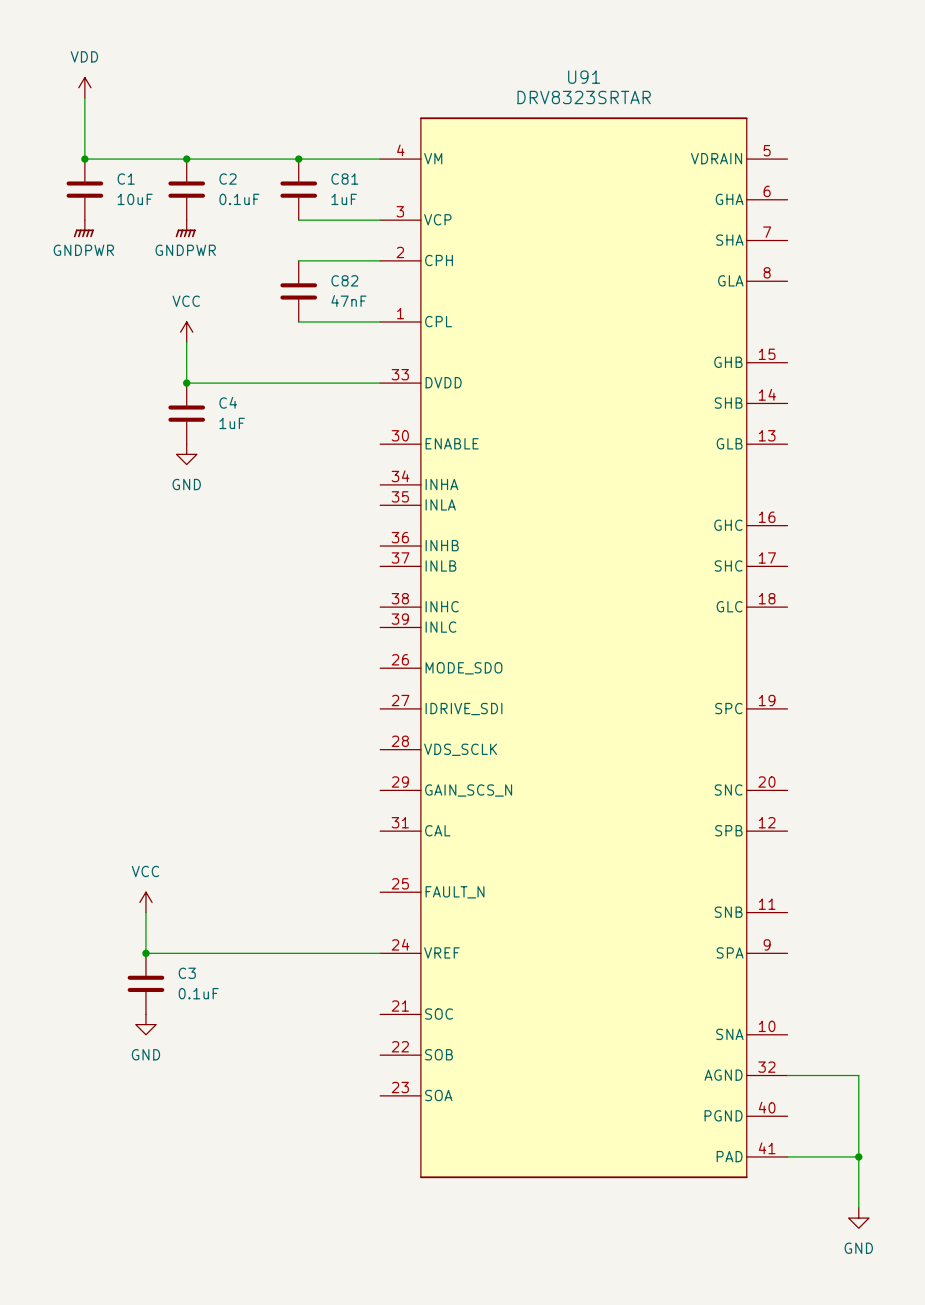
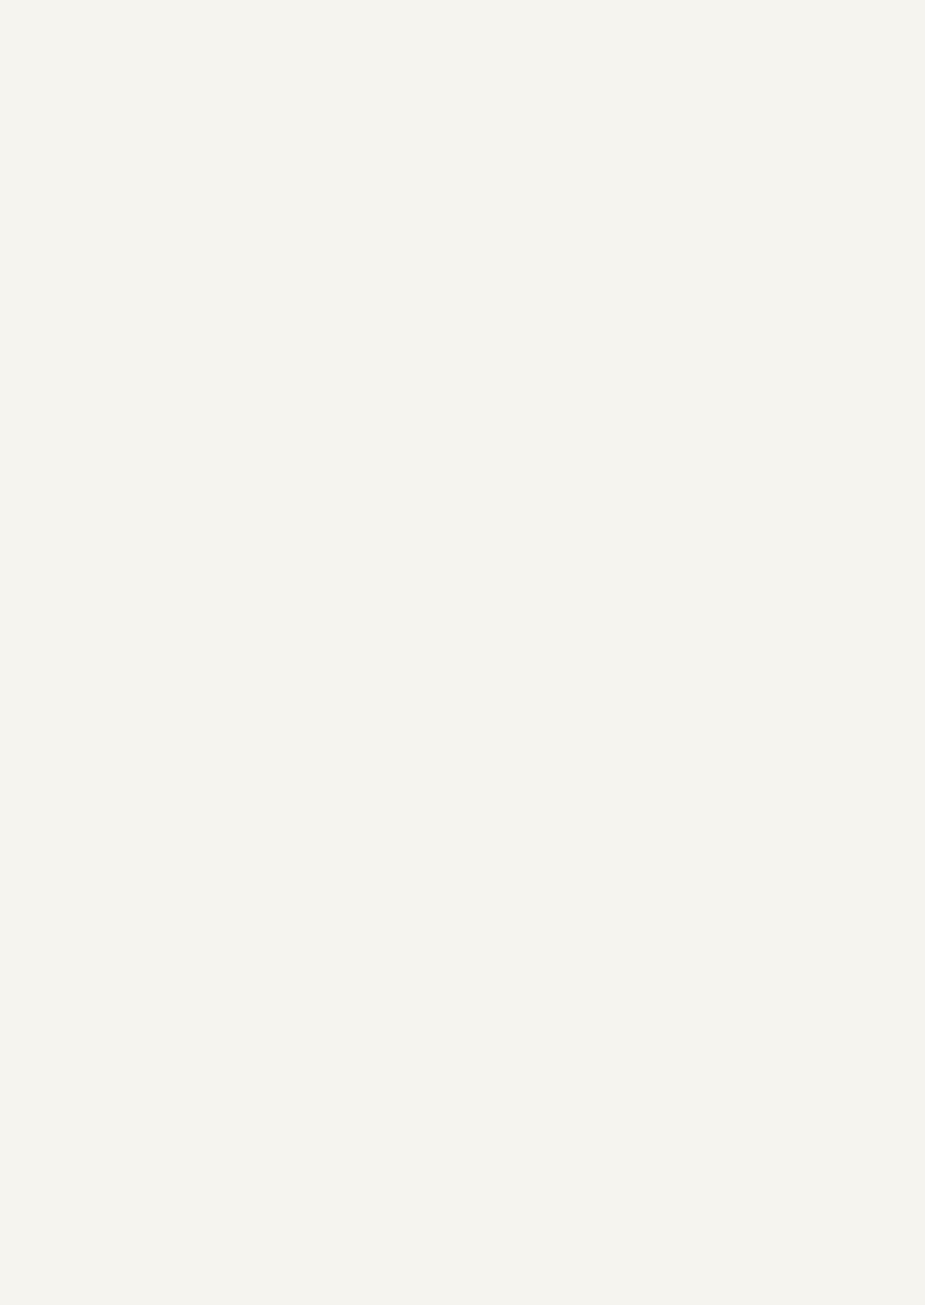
power symbol: VDD (84, 87) -> none
wire: (84, 97) (84, 159) (380, 159) -> none
junction: (84, 159) -> none
junction: (186, 159) -> none
junction: (298, 159) -> none
C1: 10uF (84, 189) -> none
C2: 0.1uF (186, 189) -> none
C81: 1uF (298, 189) -> none
wire: (298, 220) (380, 220) -> none
power symbol: GNDPWR (83, 228) -> none
power symbol: GNDPWR (185, 228) -> none
wire: (298, 260) (380, 260) -> none
C82: 47nF (298, 291) -> none
wire: (298, 321) (380, 321) -> none
power symbol: VCC (186, 332) -> none
wire: (186, 342) (186, 383) (380, 383) -> none
junction: (186, 383) -> none
C4: 1uF (186, 413) -> none
power symbol: GND (186, 454) -> none
U91: DRV8323SRTAR (583, 647) -> none
power symbol: VCC (145, 902) -> none
wire: (145, 912) (145, 953) (380, 953) -> none
junction: (145, 953) -> none
C3: 0.1uF (145, 983) -> none
power symbol: GND (145, 1024) -> none
wire: (787, 1075) (858, 1075) (858, 1207) -> none
wire: (787, 1156) (858, 1156) -> none
junction: (858, 1156) -> none
power symbol: GND (858, 1218) -> none

